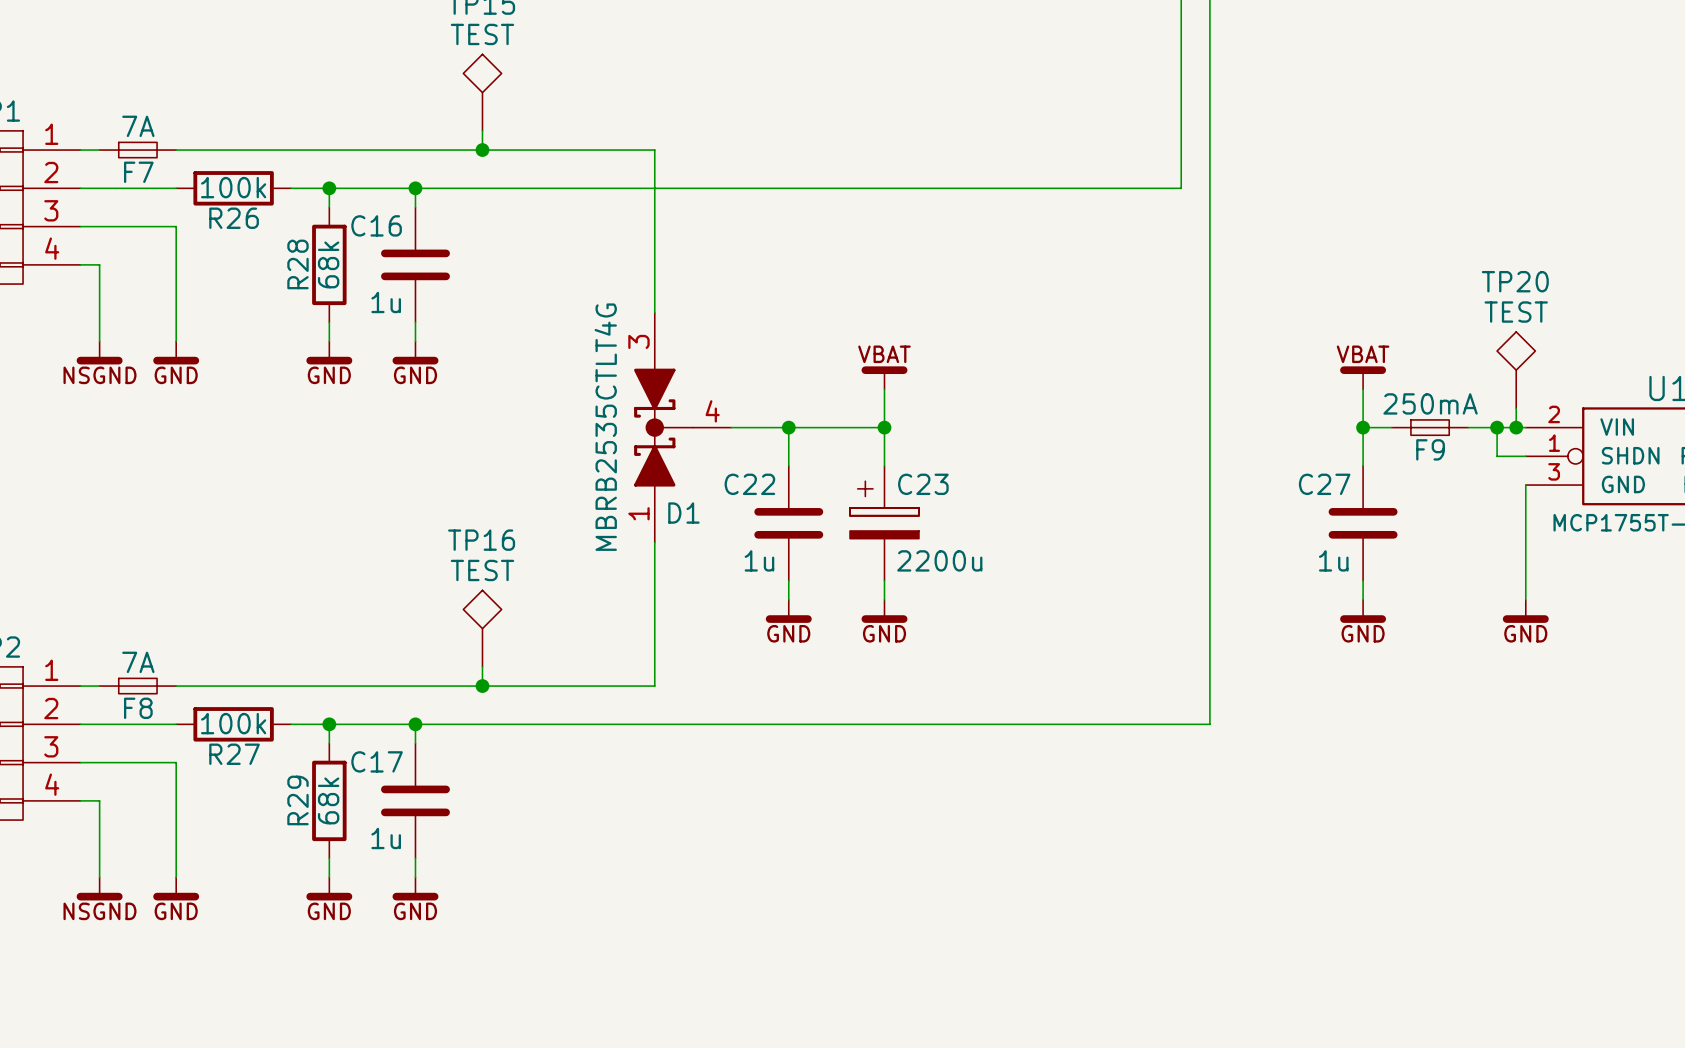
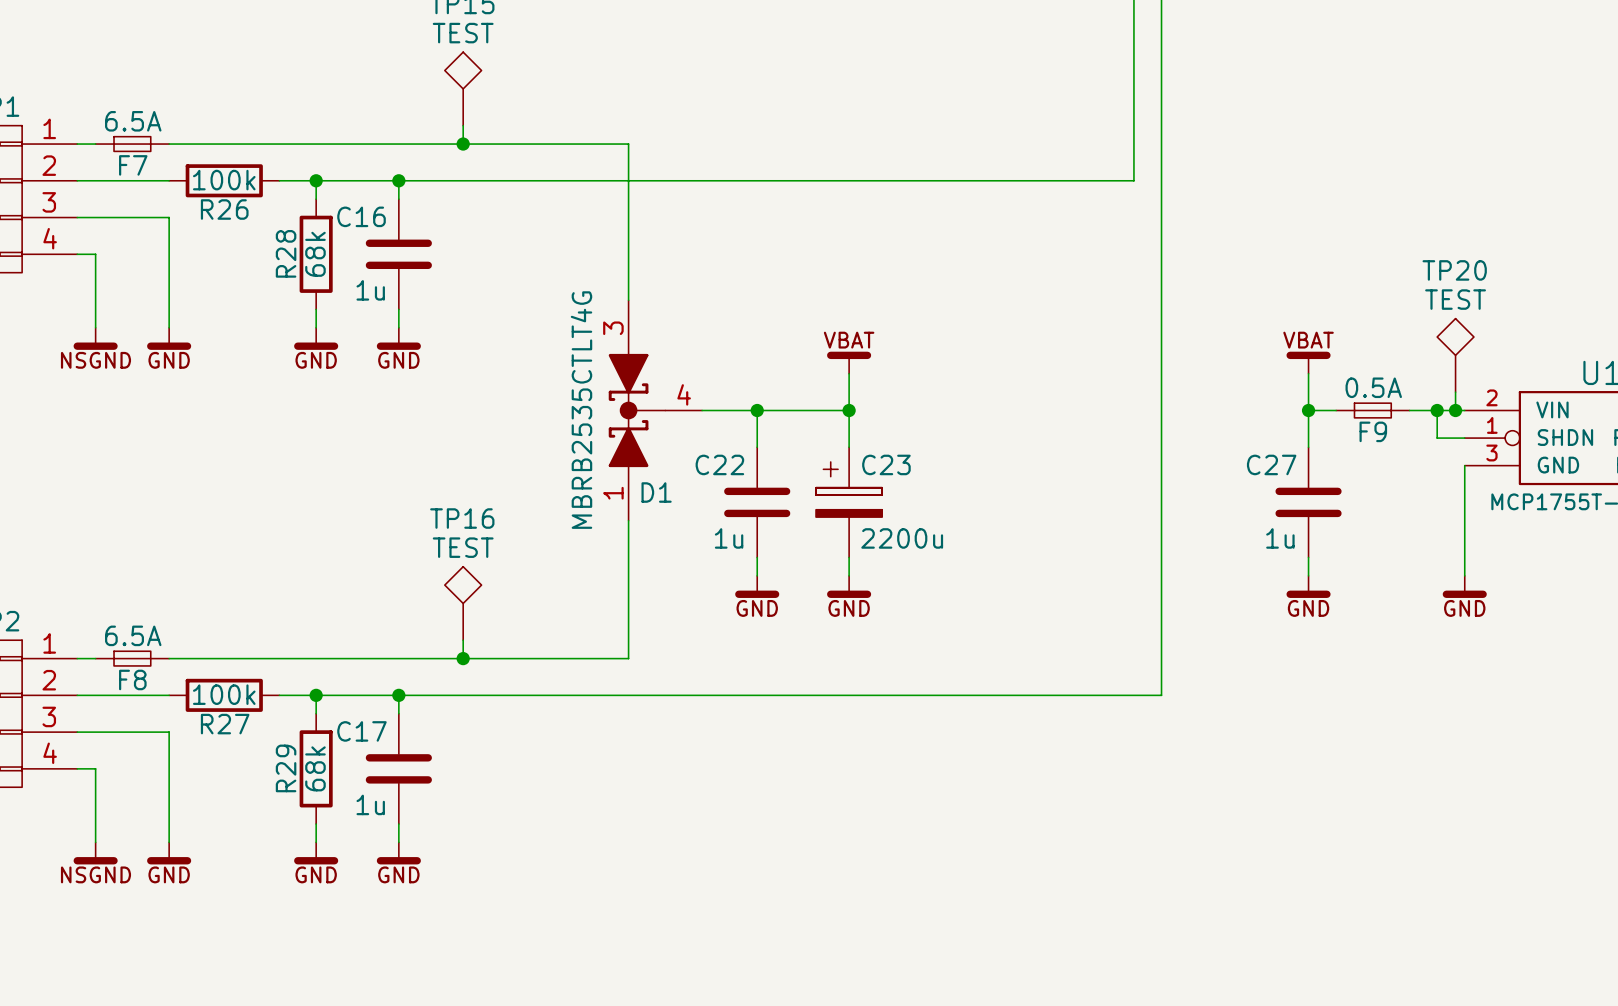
F7 value: 7A (138, 126) -> 6.5A (133, 121)
F9 value: 250mA (1430, 403) -> 0.5A (1373, 387)
F8 value: 7A (138, 662) -> 6.5A (133, 635)

